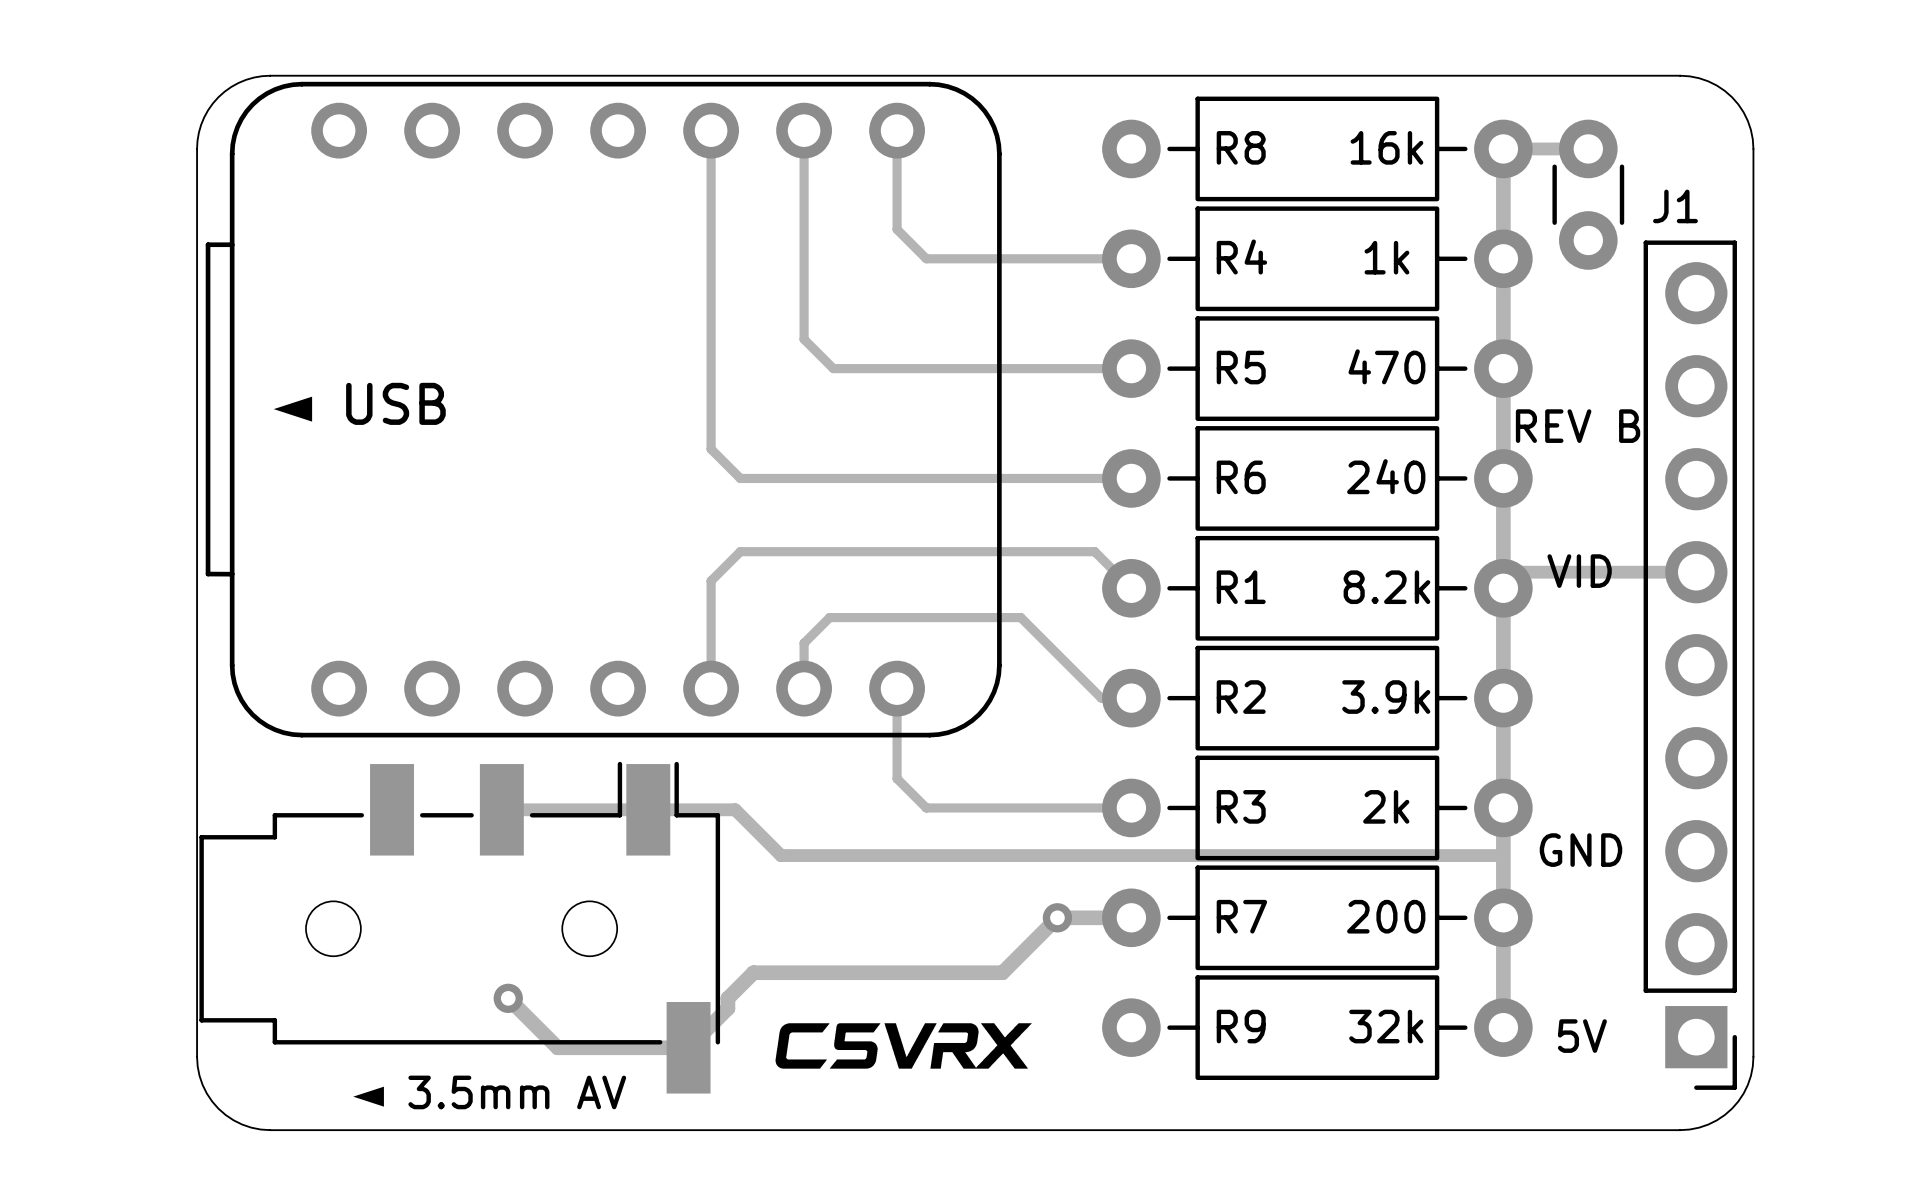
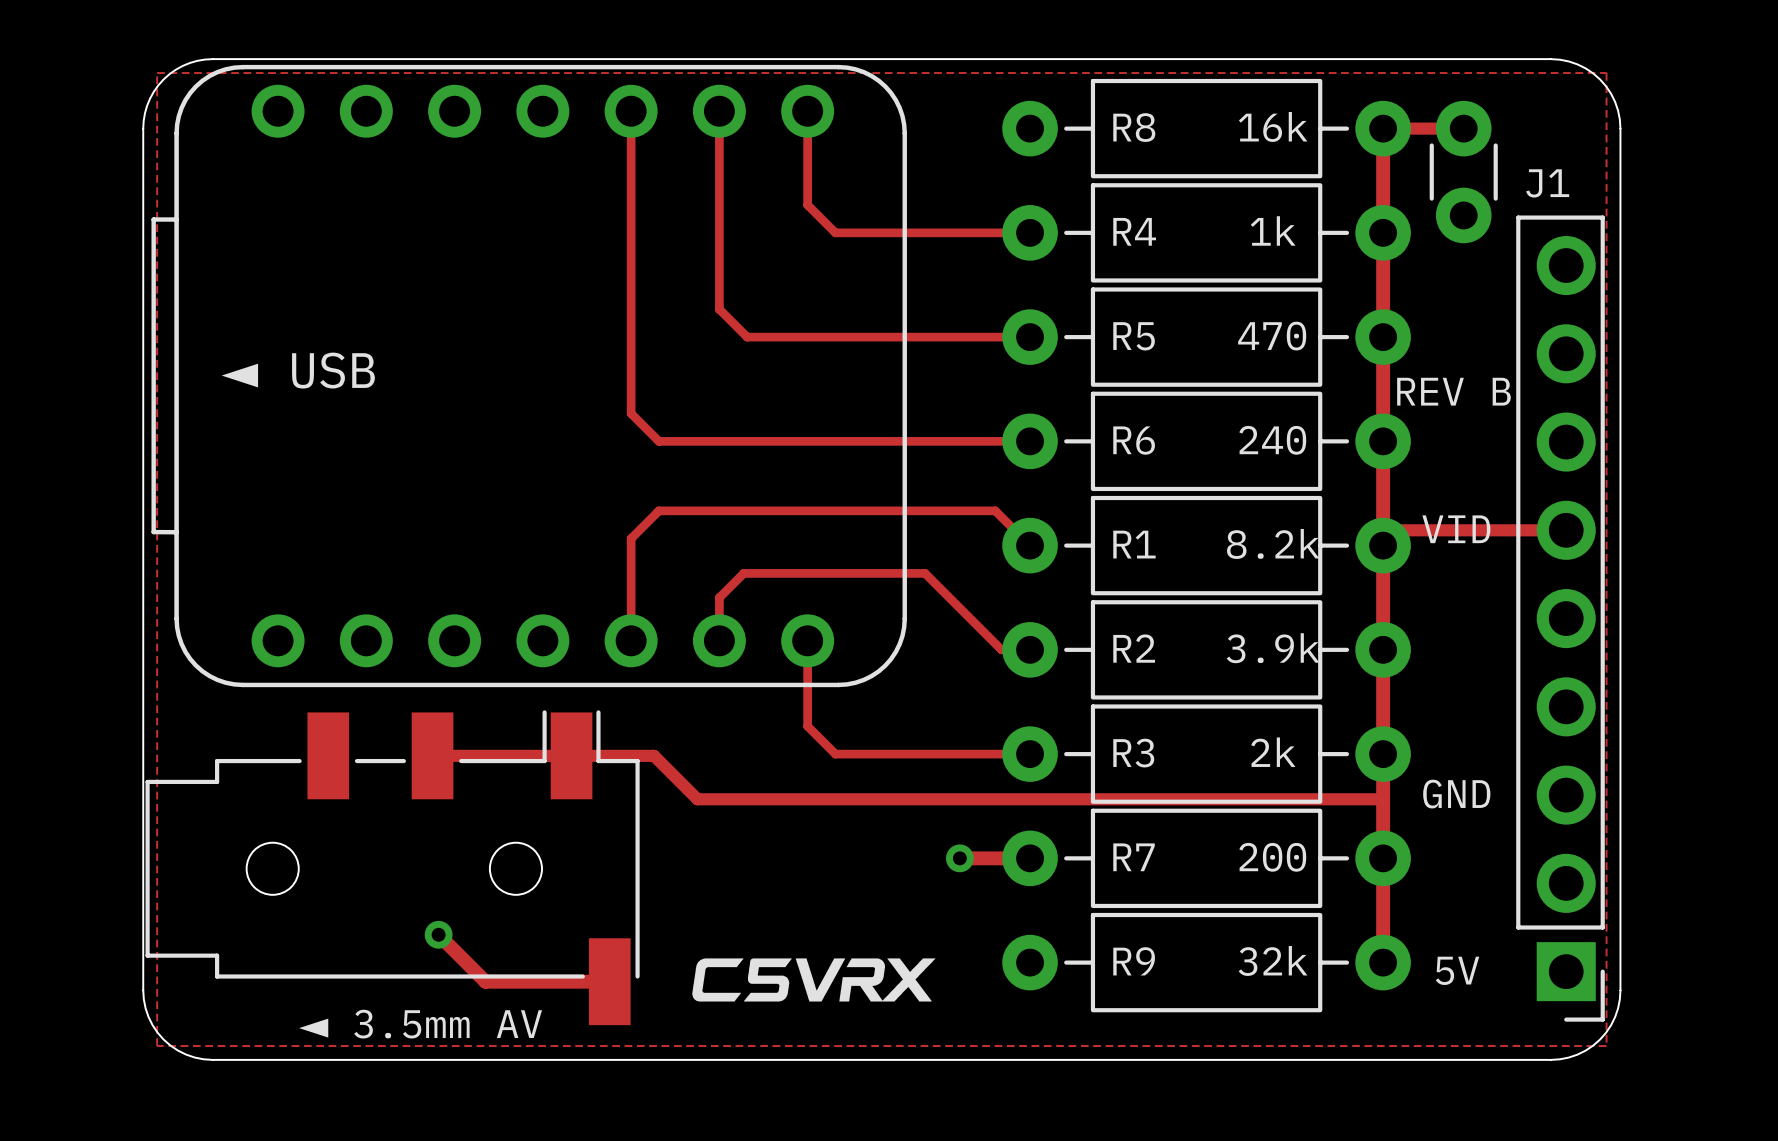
zone outline: none -> (157, 73) (1606, 73) (1606, 1046) (157, 1046) (157, 73)
track: (1057, 917) (1002, 972) (753, 972) (727, 998) (727, 1008) (688, 1047) -> none

